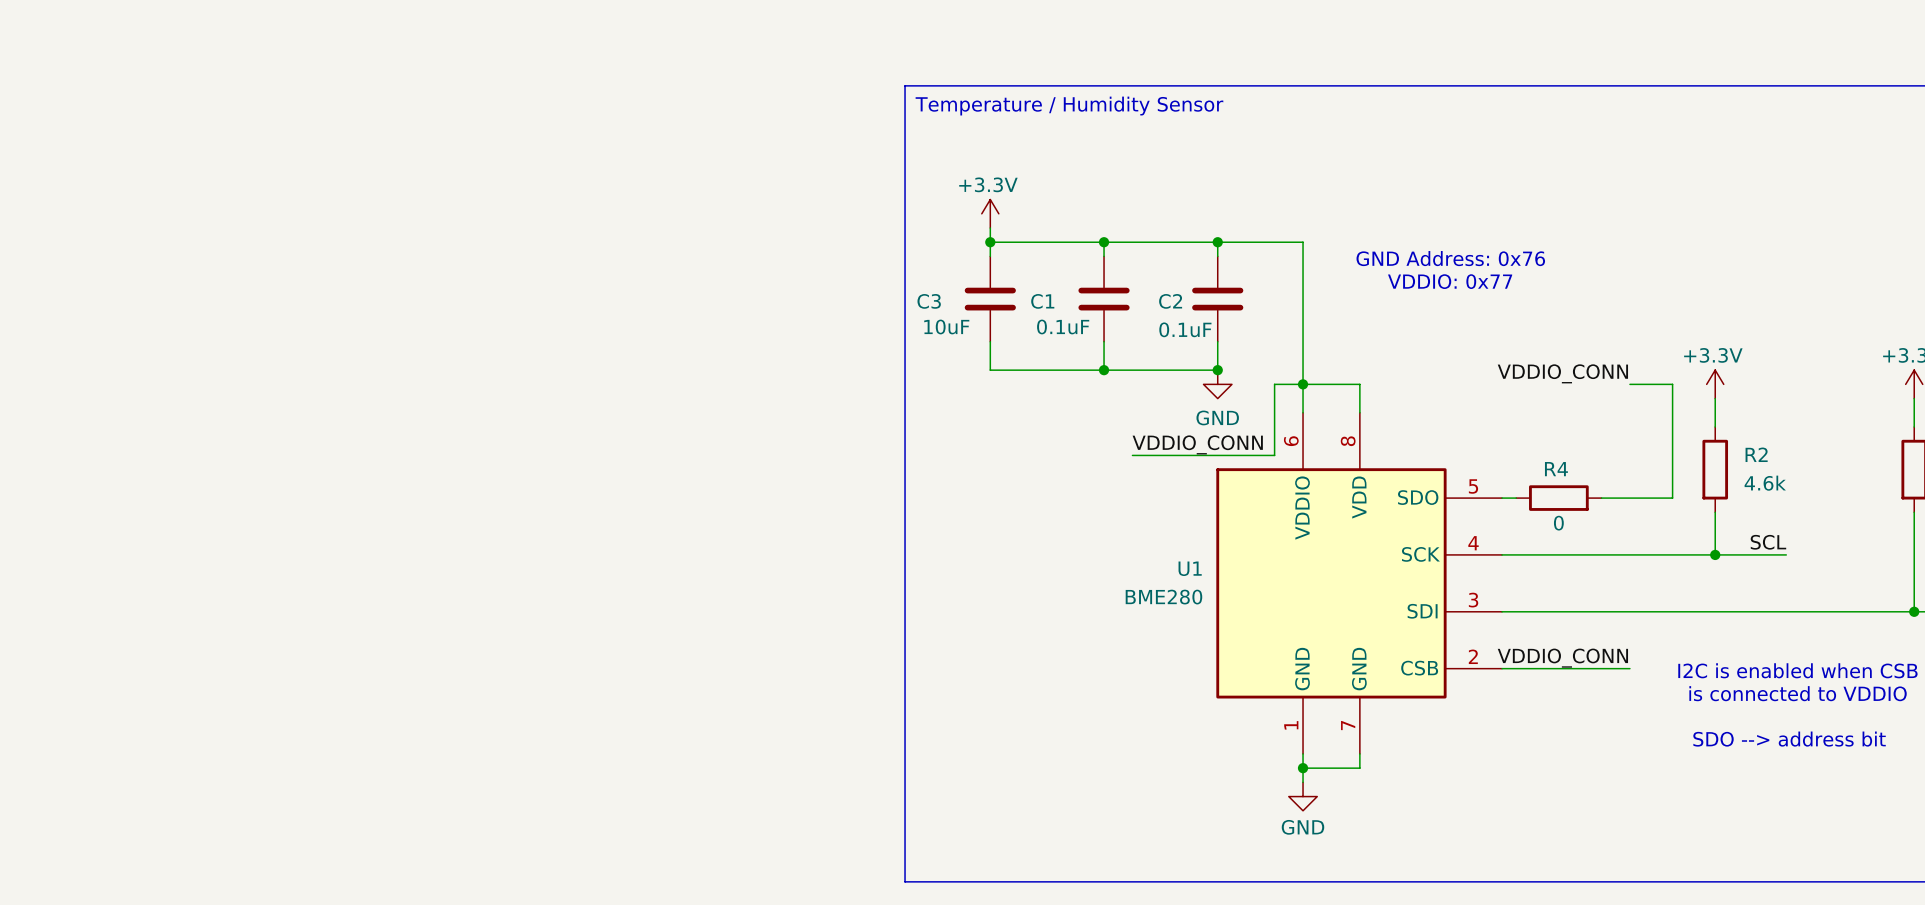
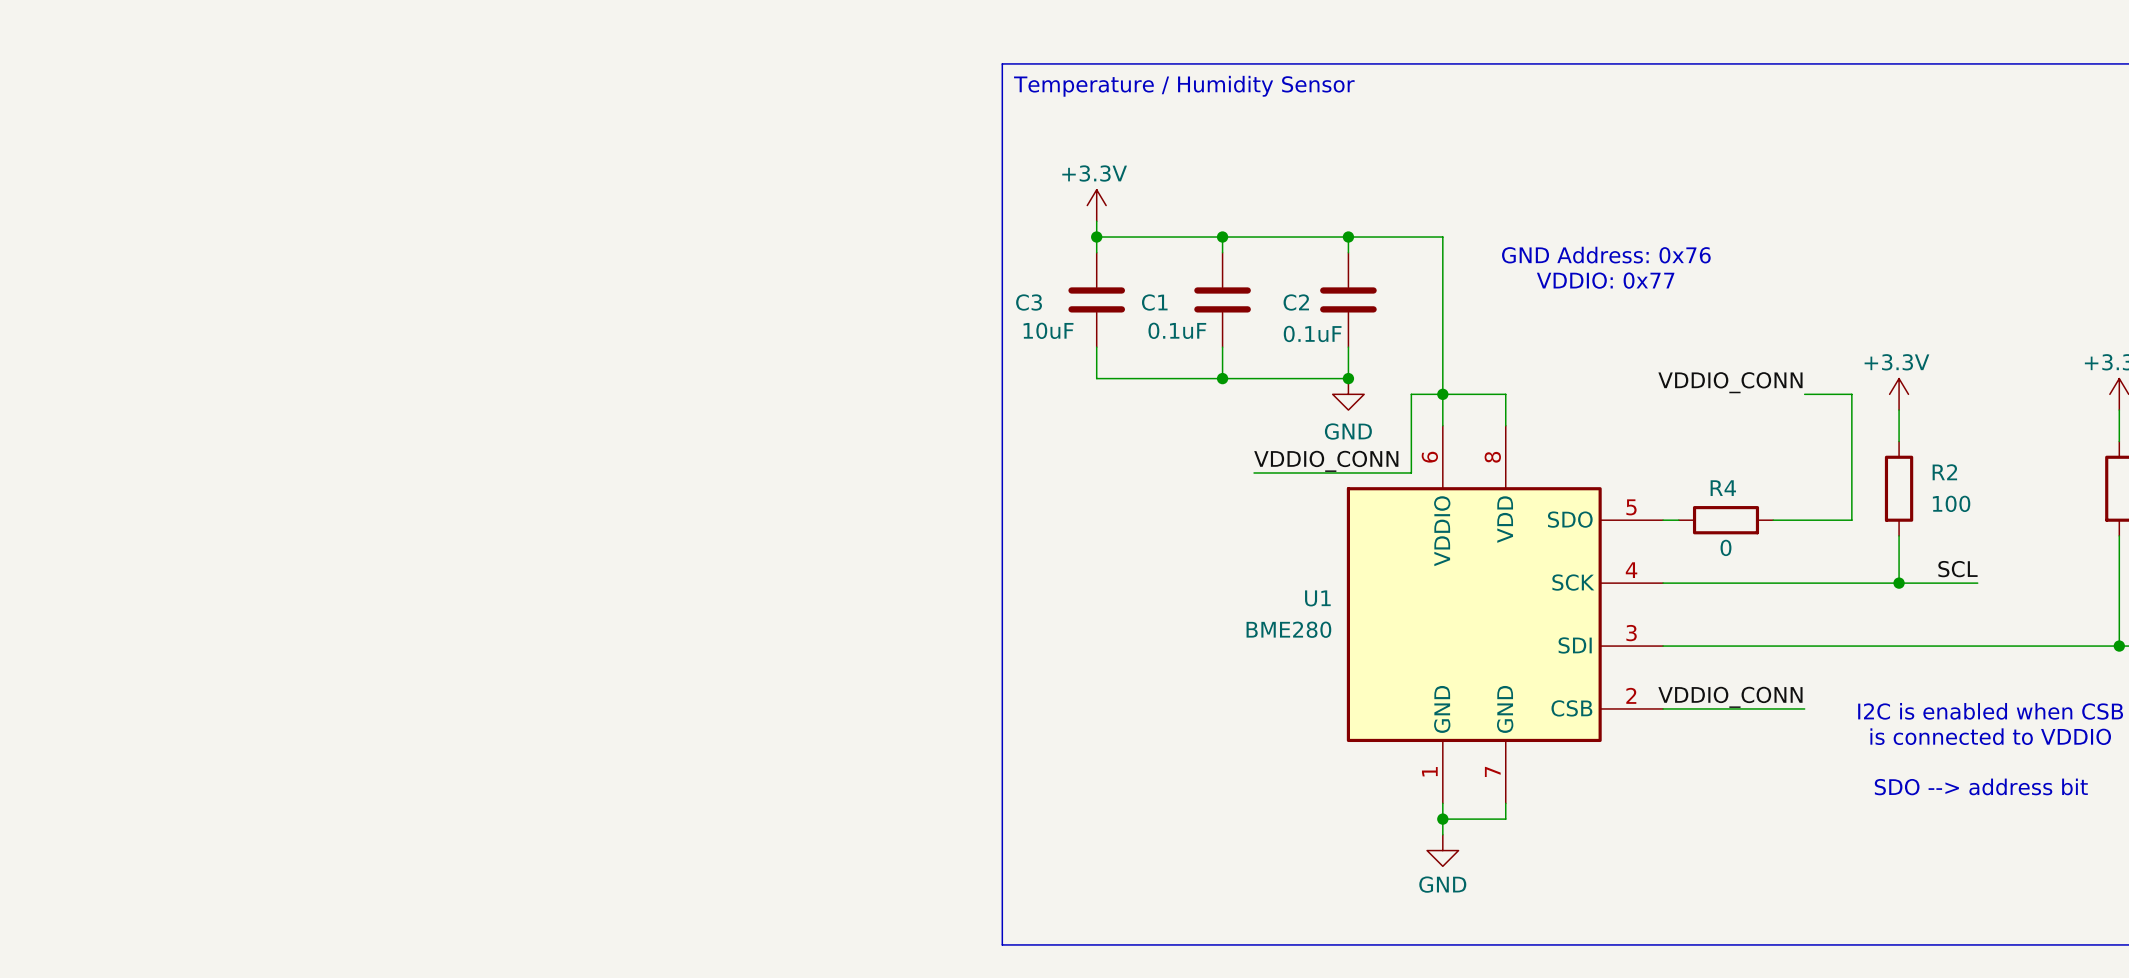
R2 value: 4.6k (1765, 483) -> 100 (1951, 503)

